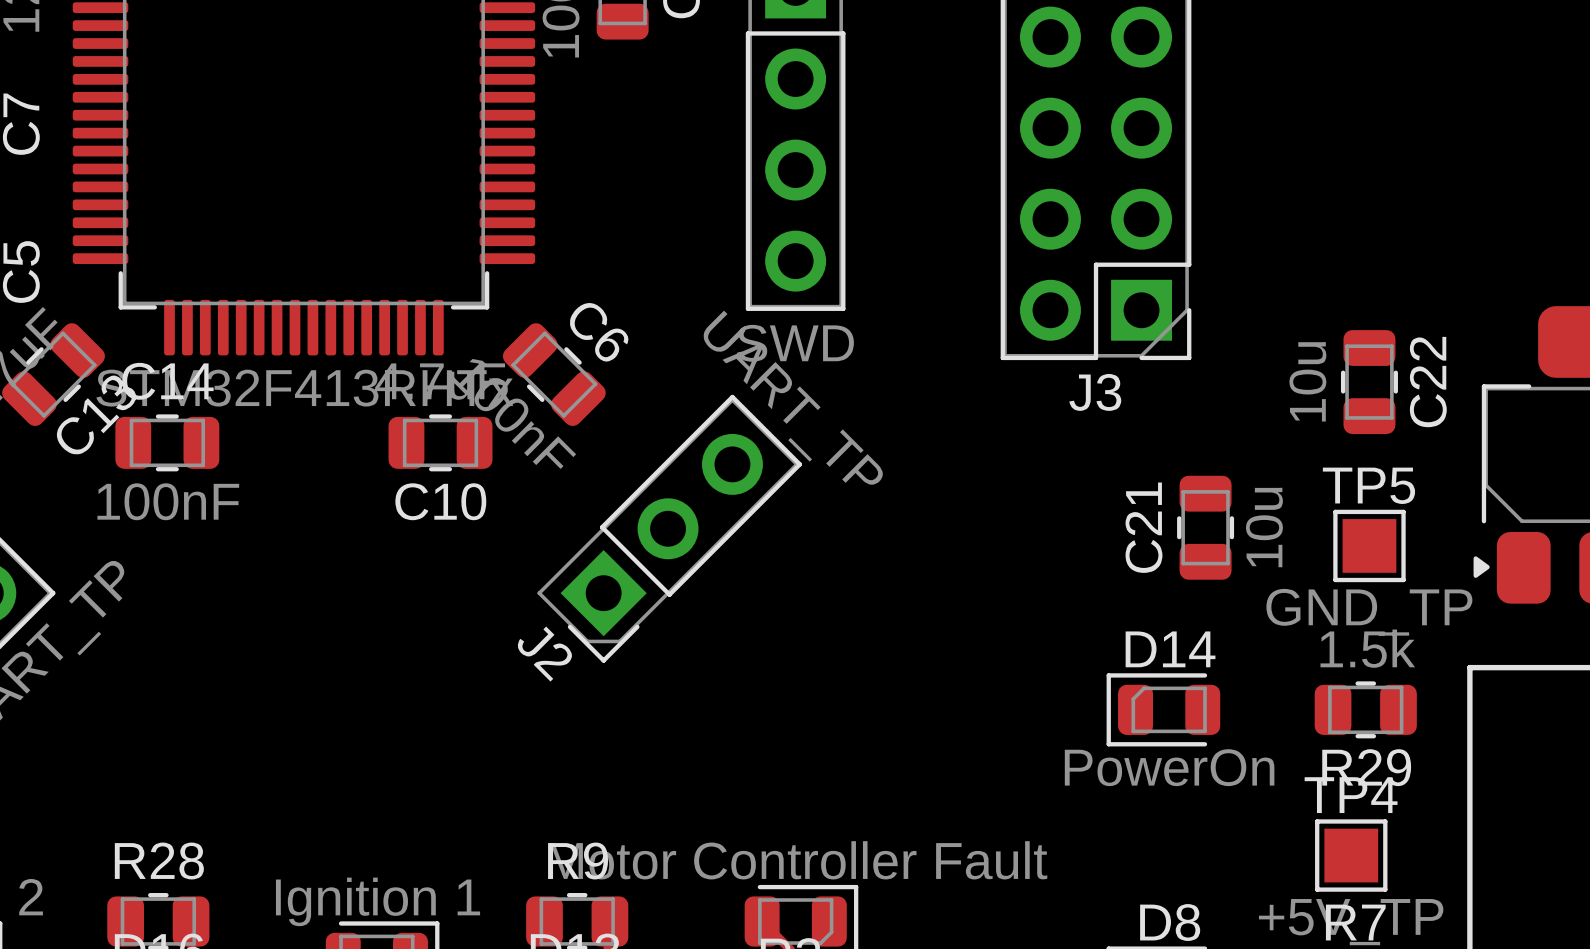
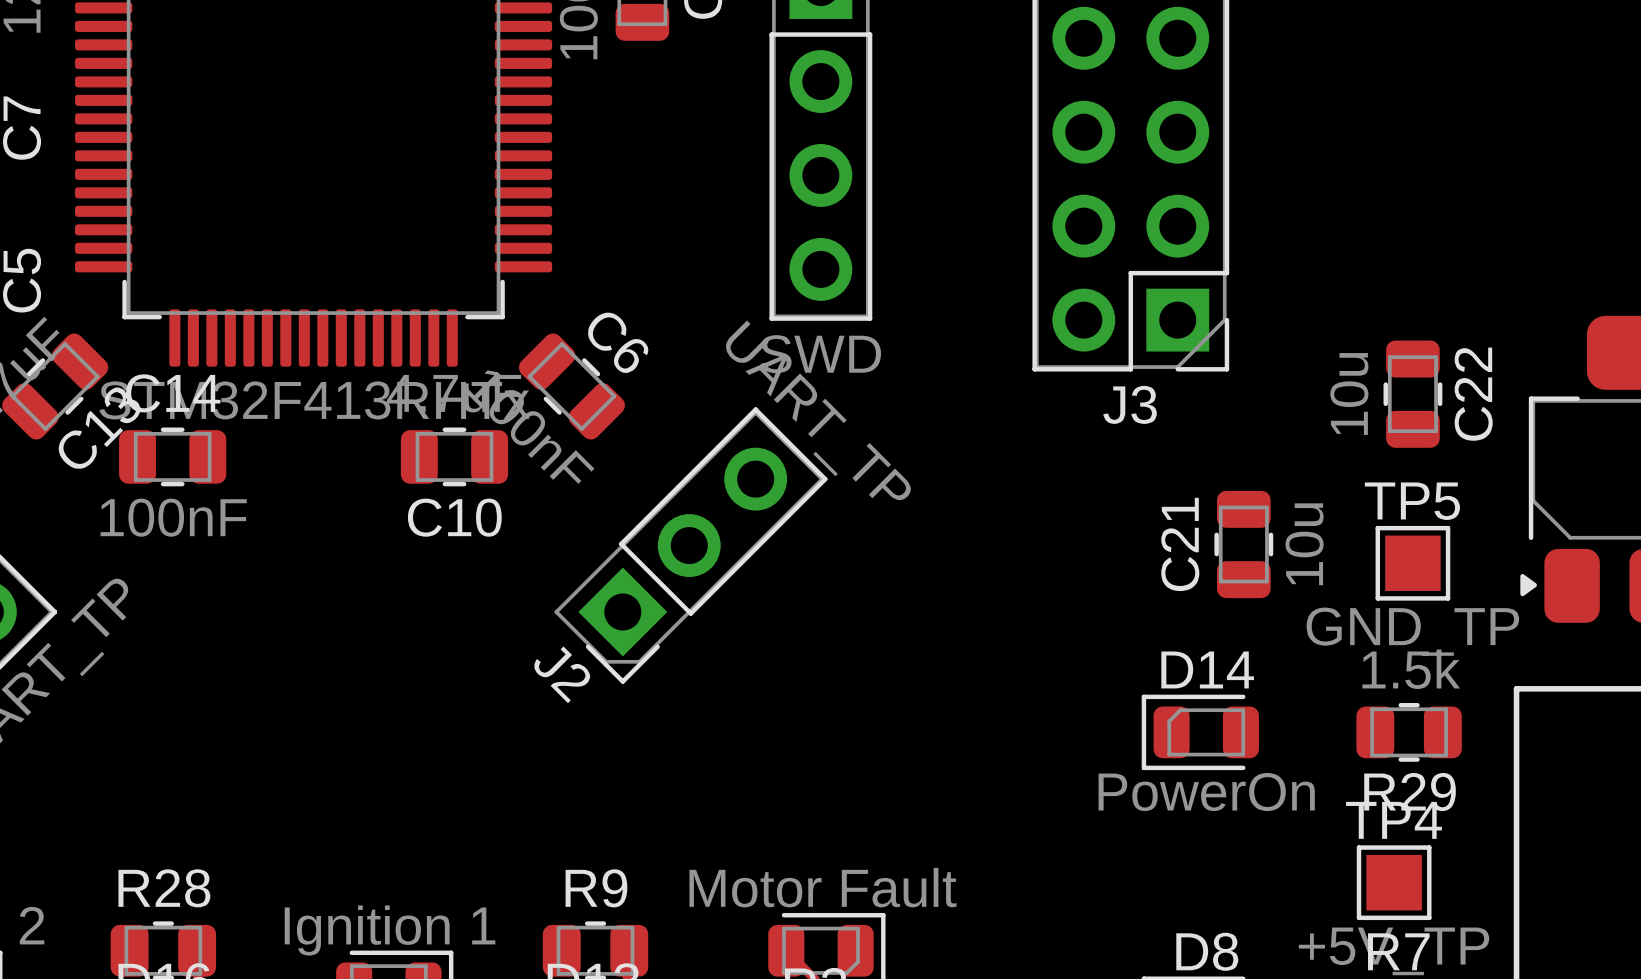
part value: Motor Controller Fault (797, 860) -> Motor Fault (822, 887)

